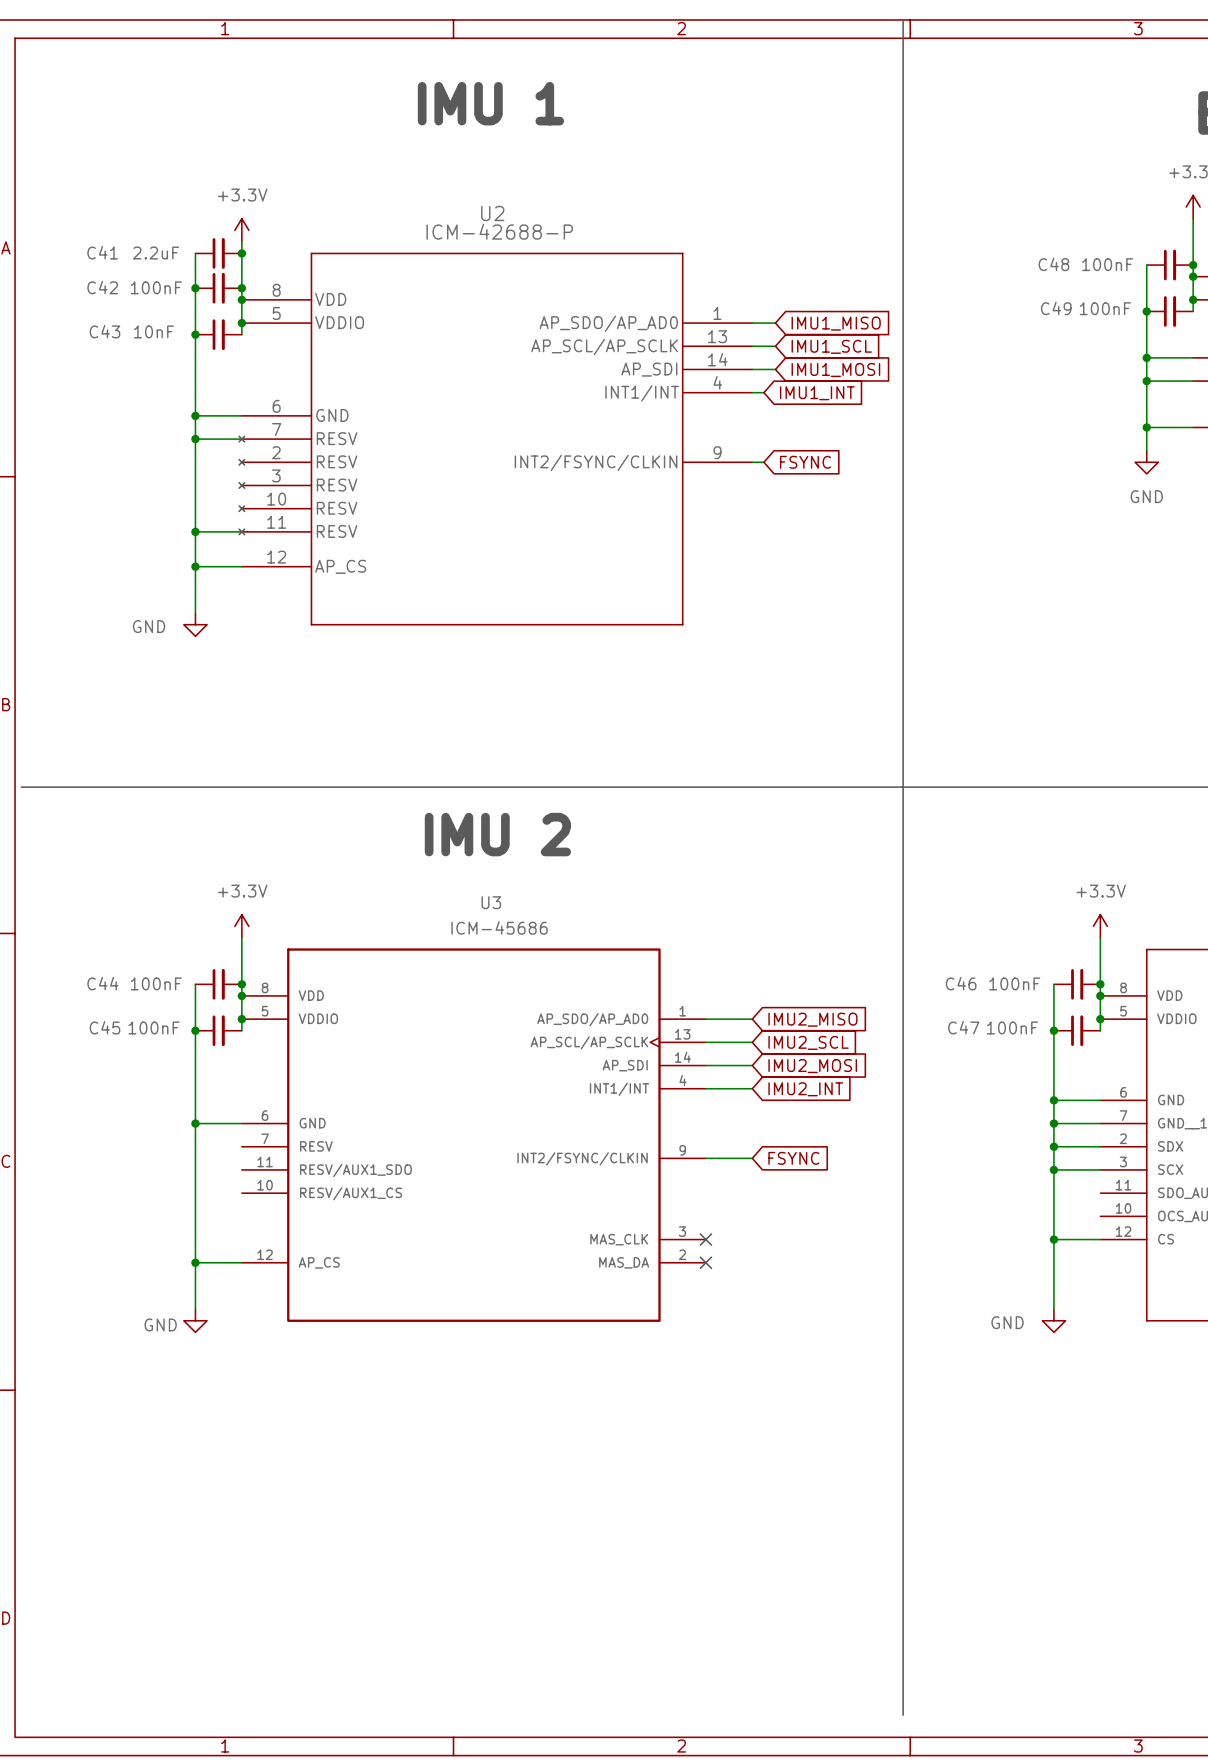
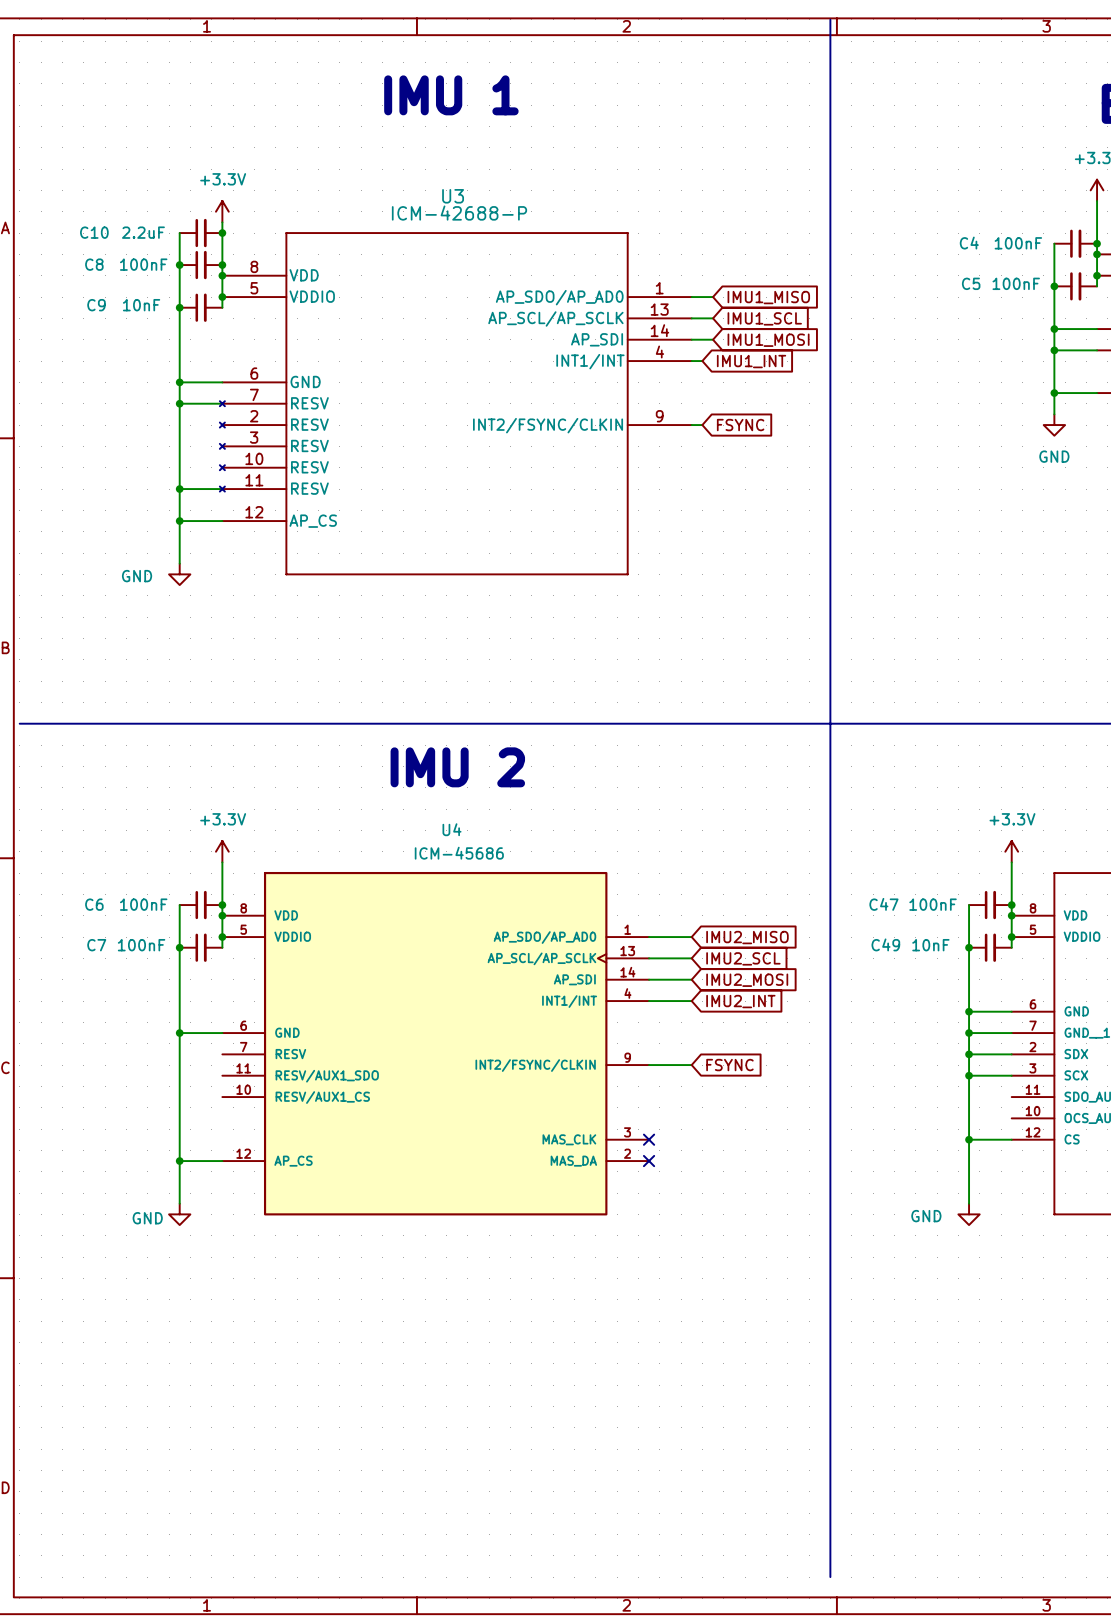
U2 name: U2 (492, 213) -> U3 (453, 196)
C41 name: C41 (102, 252) -> C10 (94, 232)
C48 name: C48 (1053, 264) -> C4 (969, 243)
C42 name: C42 (102, 287) -> C8 (94, 264)
C49 name: C49 (1056, 308) -> C5 (971, 283)
C43 name: C43 (104, 331) -> C9 (96, 305)
U3 name: U3 (491, 902) -> U4 (451, 829)
C44 name: C44 (102, 983) -> C6 (94, 904)
C46 name: C46 (961, 983) -> C47 (883, 904)
C45 name: C45 (104, 1027) -> C7 (96, 945)
C47 name: C47 (963, 1027) -> C49 (885, 944)
C47 value: 100nF (1012, 1027) -> 10nF (930, 945)

